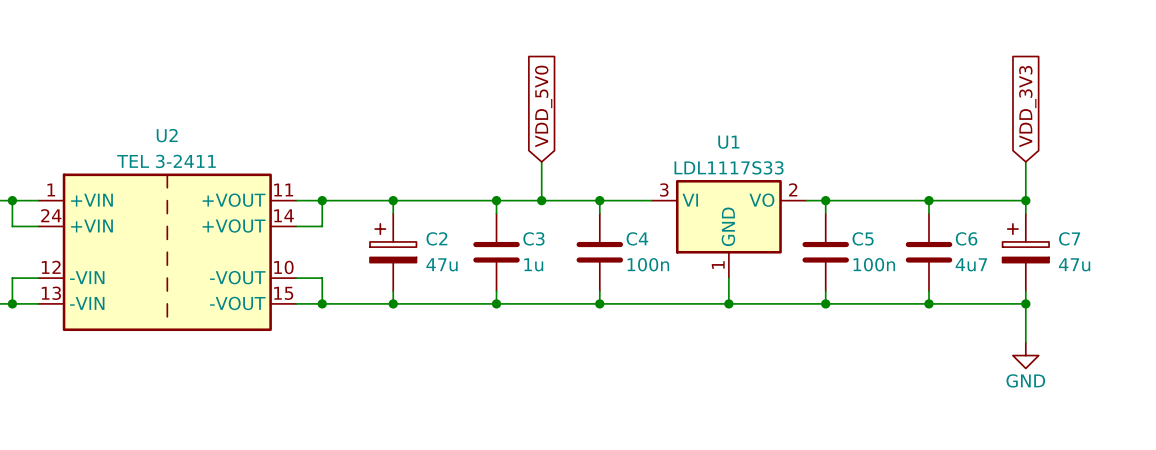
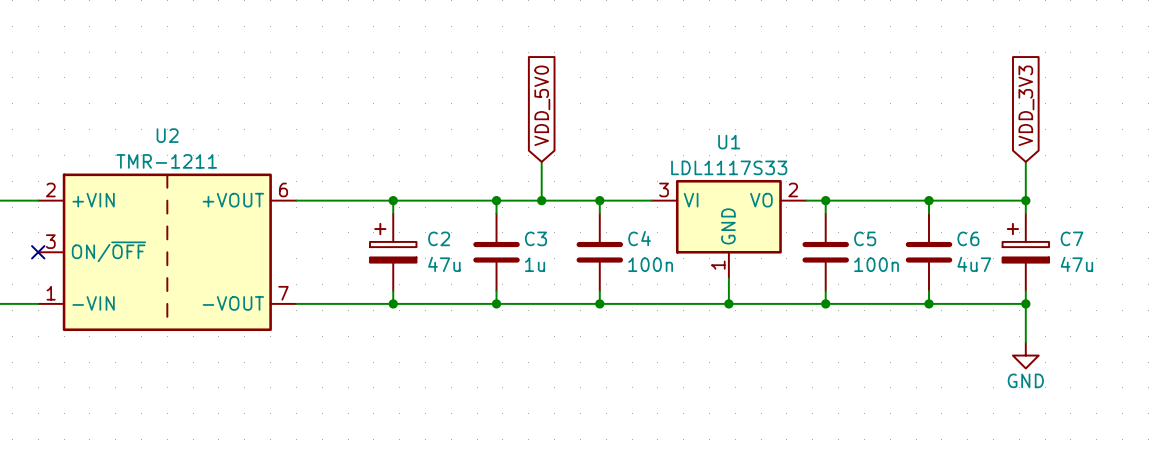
U2 value: TEL 3-2411 (166, 161) -> TMR-1211 (166, 161)
U2 symbol: [38, 173, 297, 332] -> [38, 173, 297, 332]
wire: (12, 200) (12, 226) (38, 226) -> none
junction: (12, 200) -> none
wire: (322, 200) (322, 226) (296, 226) -> none
junction: (322, 200) -> none
no-connect mark: none -> (38, 252)
wire: (38, 278) (12, 278) (12, 303) -> none
wire: (296, 278) (322, 278) (322, 303) -> none
junction: (12, 303) -> none
junction: (322, 303) -> none

